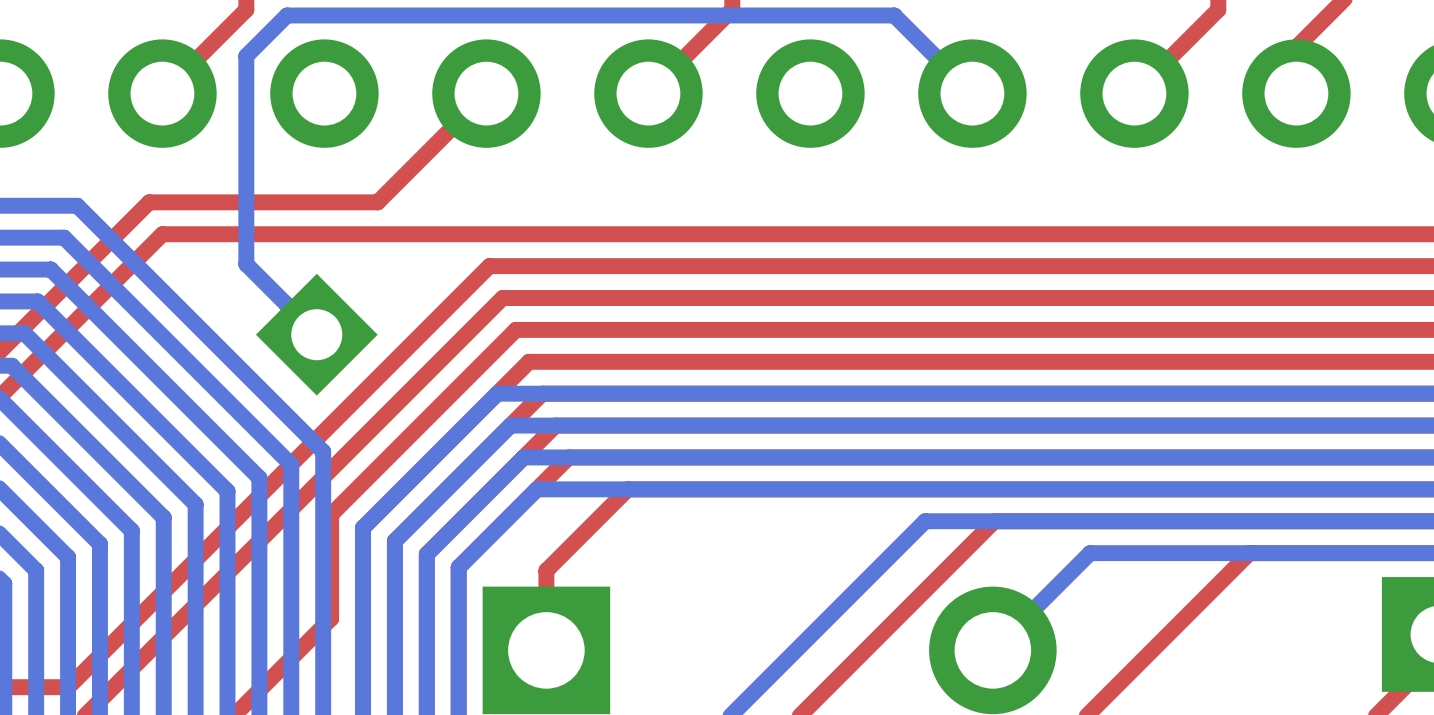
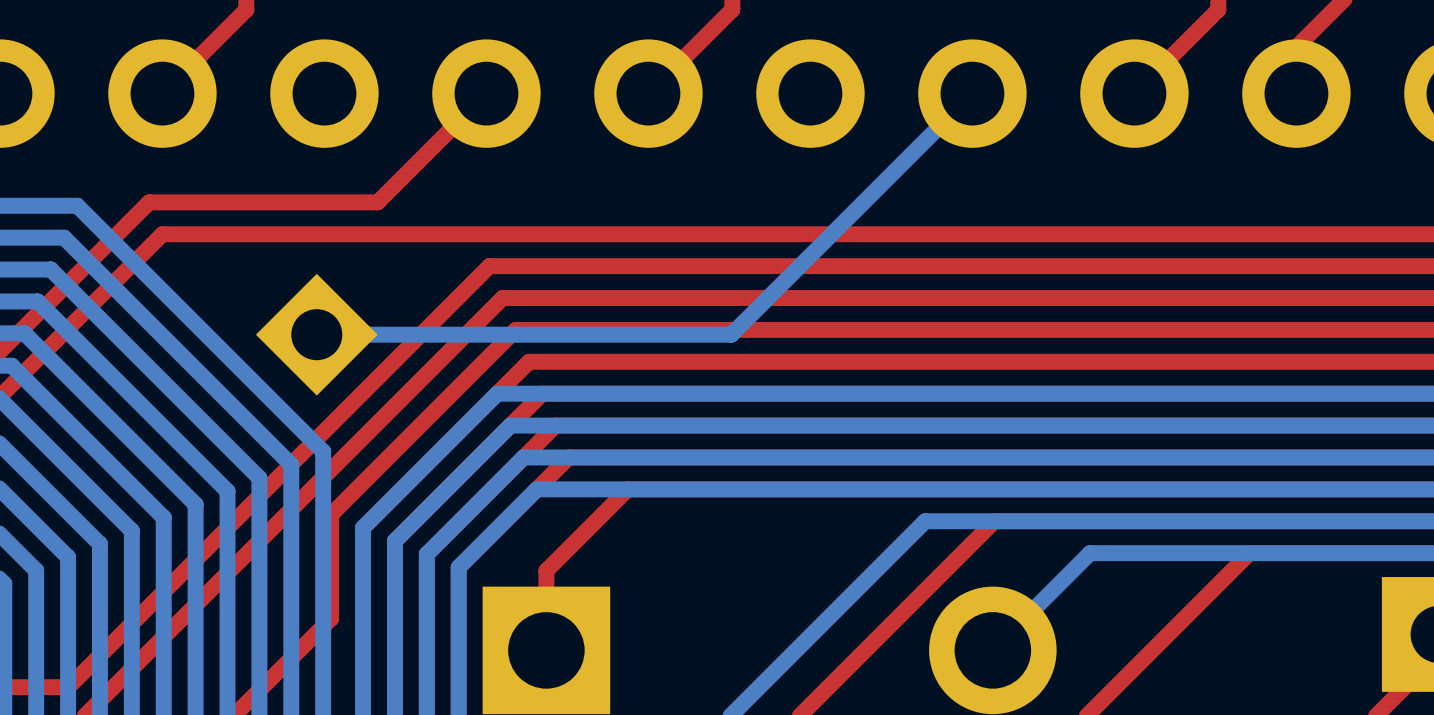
bottom track: (972, 93) (894, 15) (286, 15) (246, 56) (246, 264) (316, 334) -> (972, 93) (731, 334) (316, 334)

